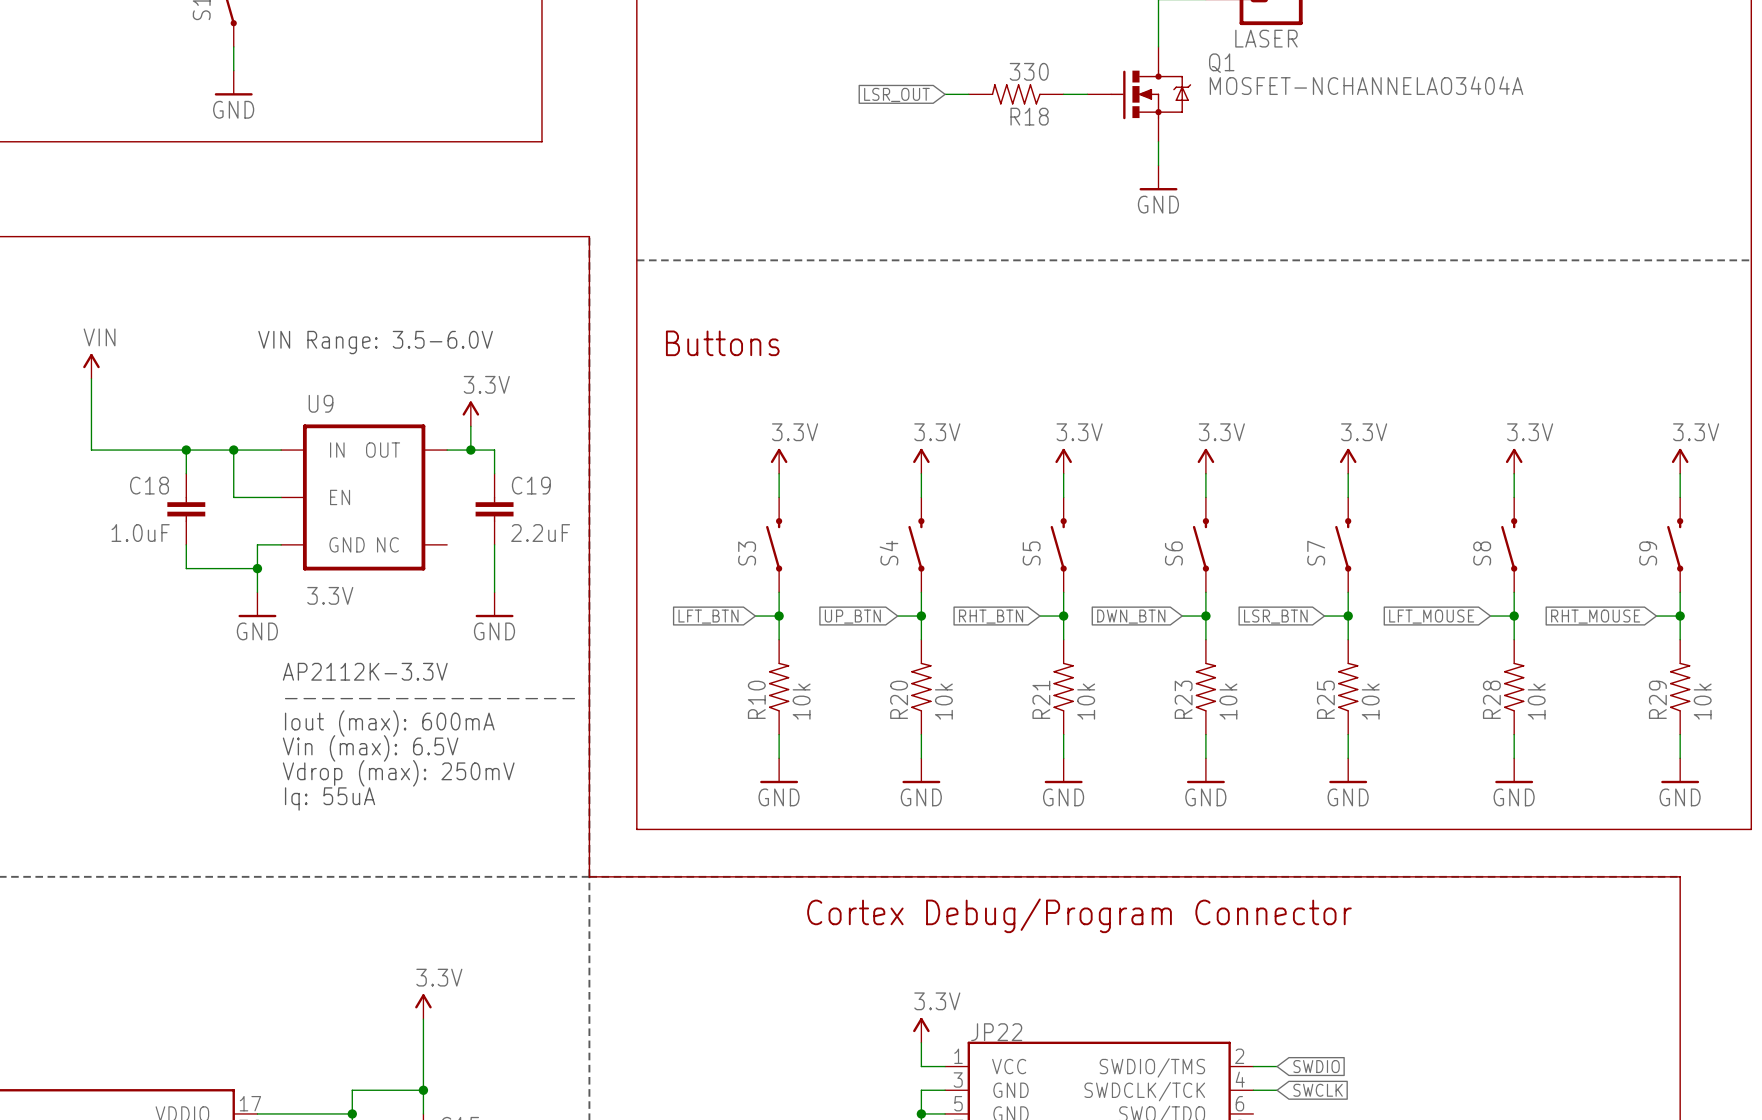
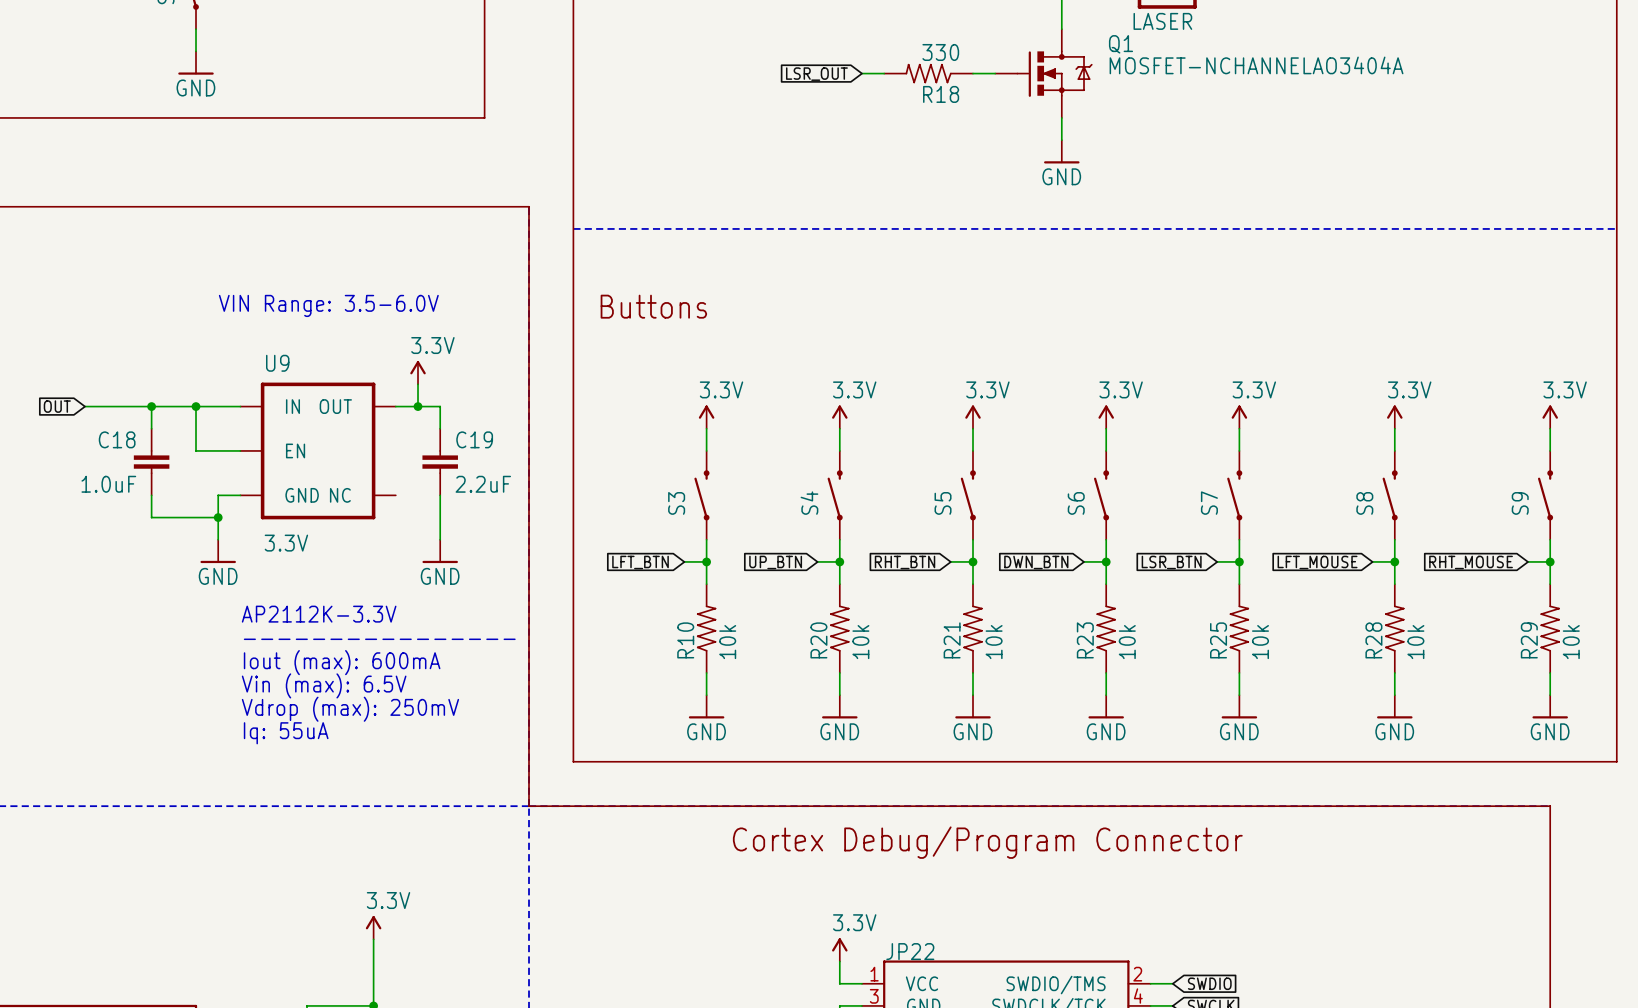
power symbol: VIN (91, 366) -> none
wire: (91, 378) (91, 450) (115, 450) -> none
global label: none -> OUT (57, 406)

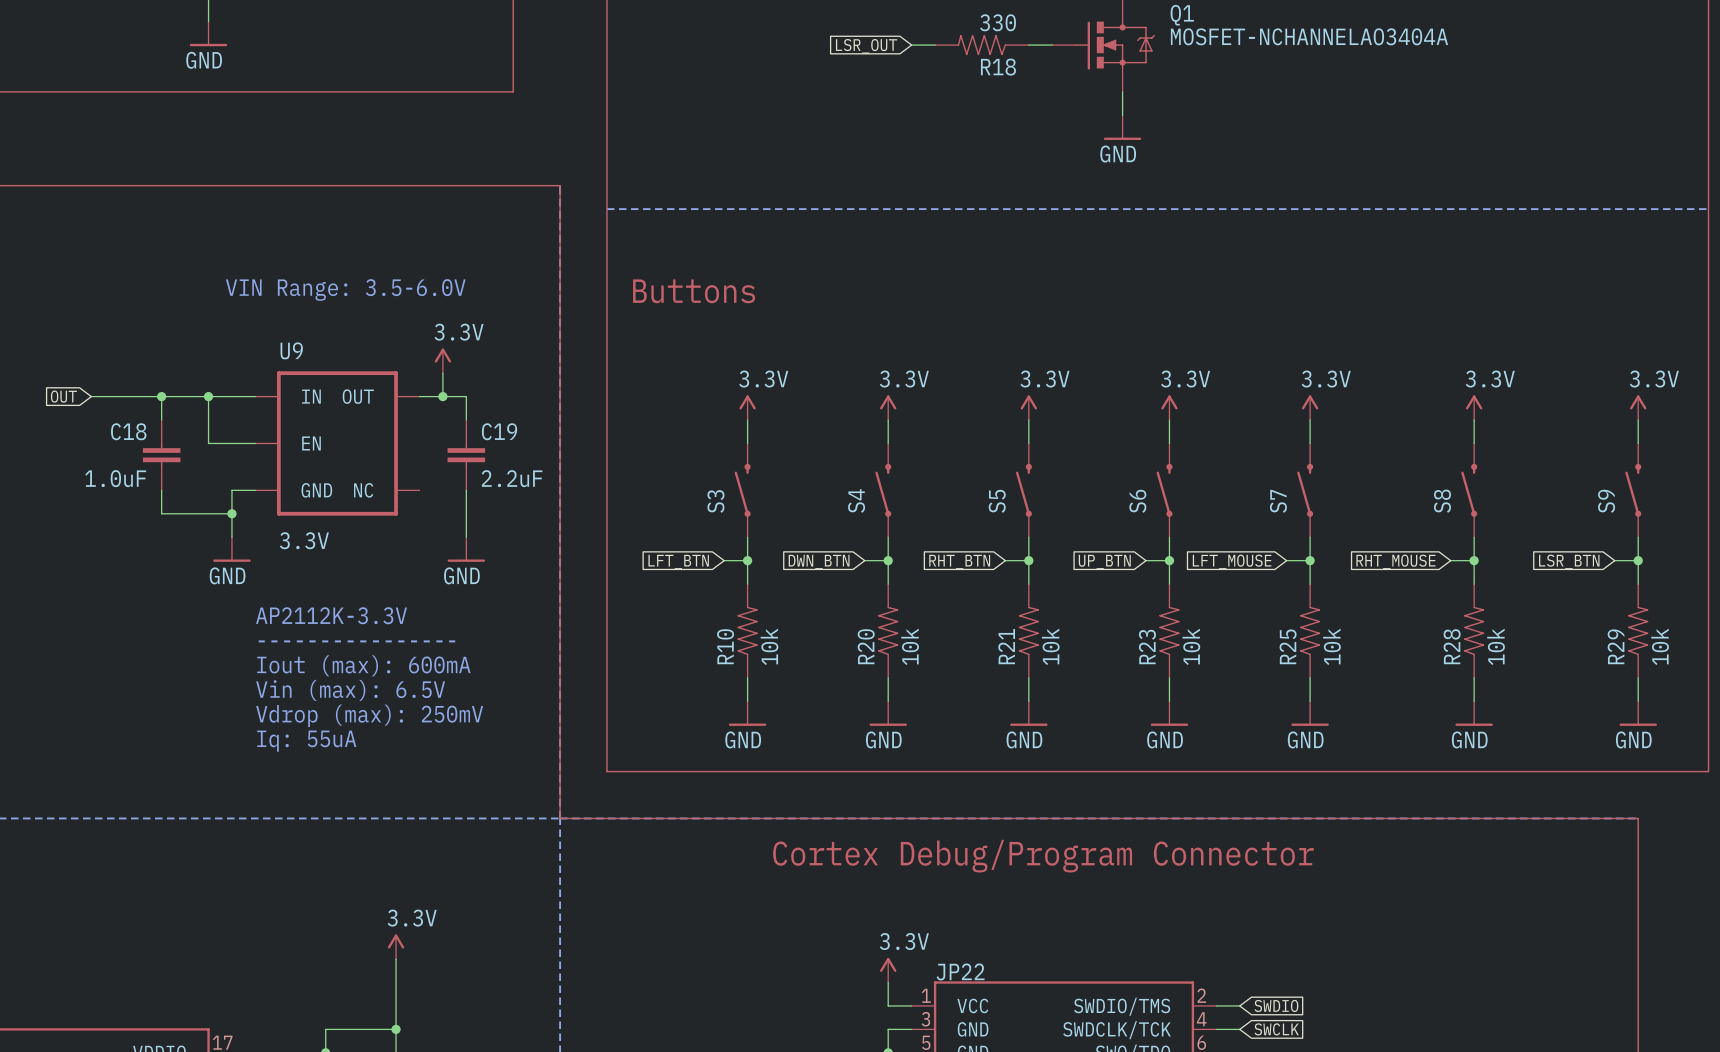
global label: UP_BTN (775, 562) -> DWN_BTN (819, 562)
global label: DWN_BTN (1036, 562) -> UP_BTN (1104, 562)
global label: LSR_BTN (1171, 562) -> LFT_MOUSE (1232, 561)
global label: LFT_MOUSE (1317, 562) -> RHT_MOUSE (1395, 561)
global label: RHT_MOUSE (1471, 562) -> LSR_BTN (1569, 561)

